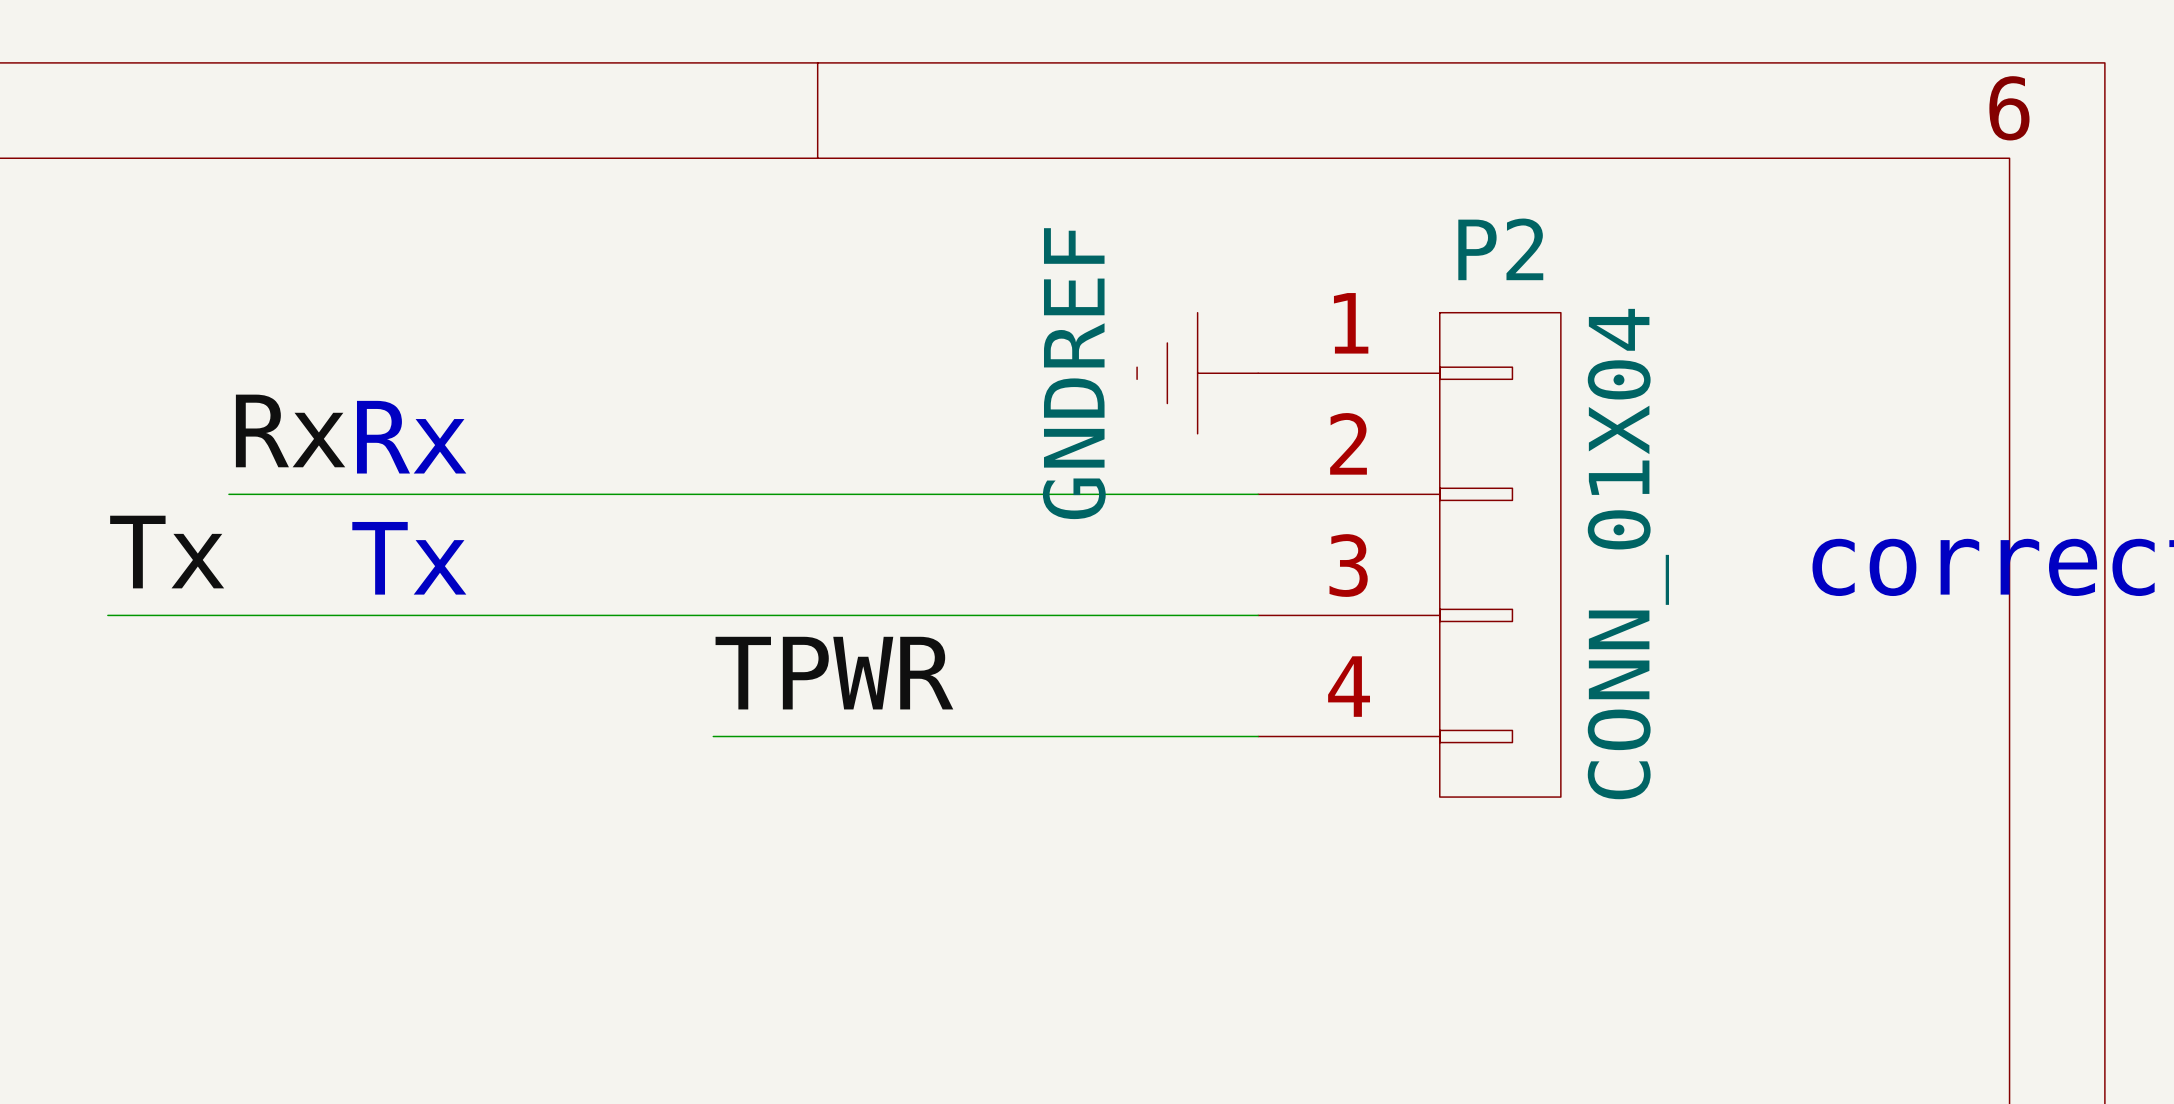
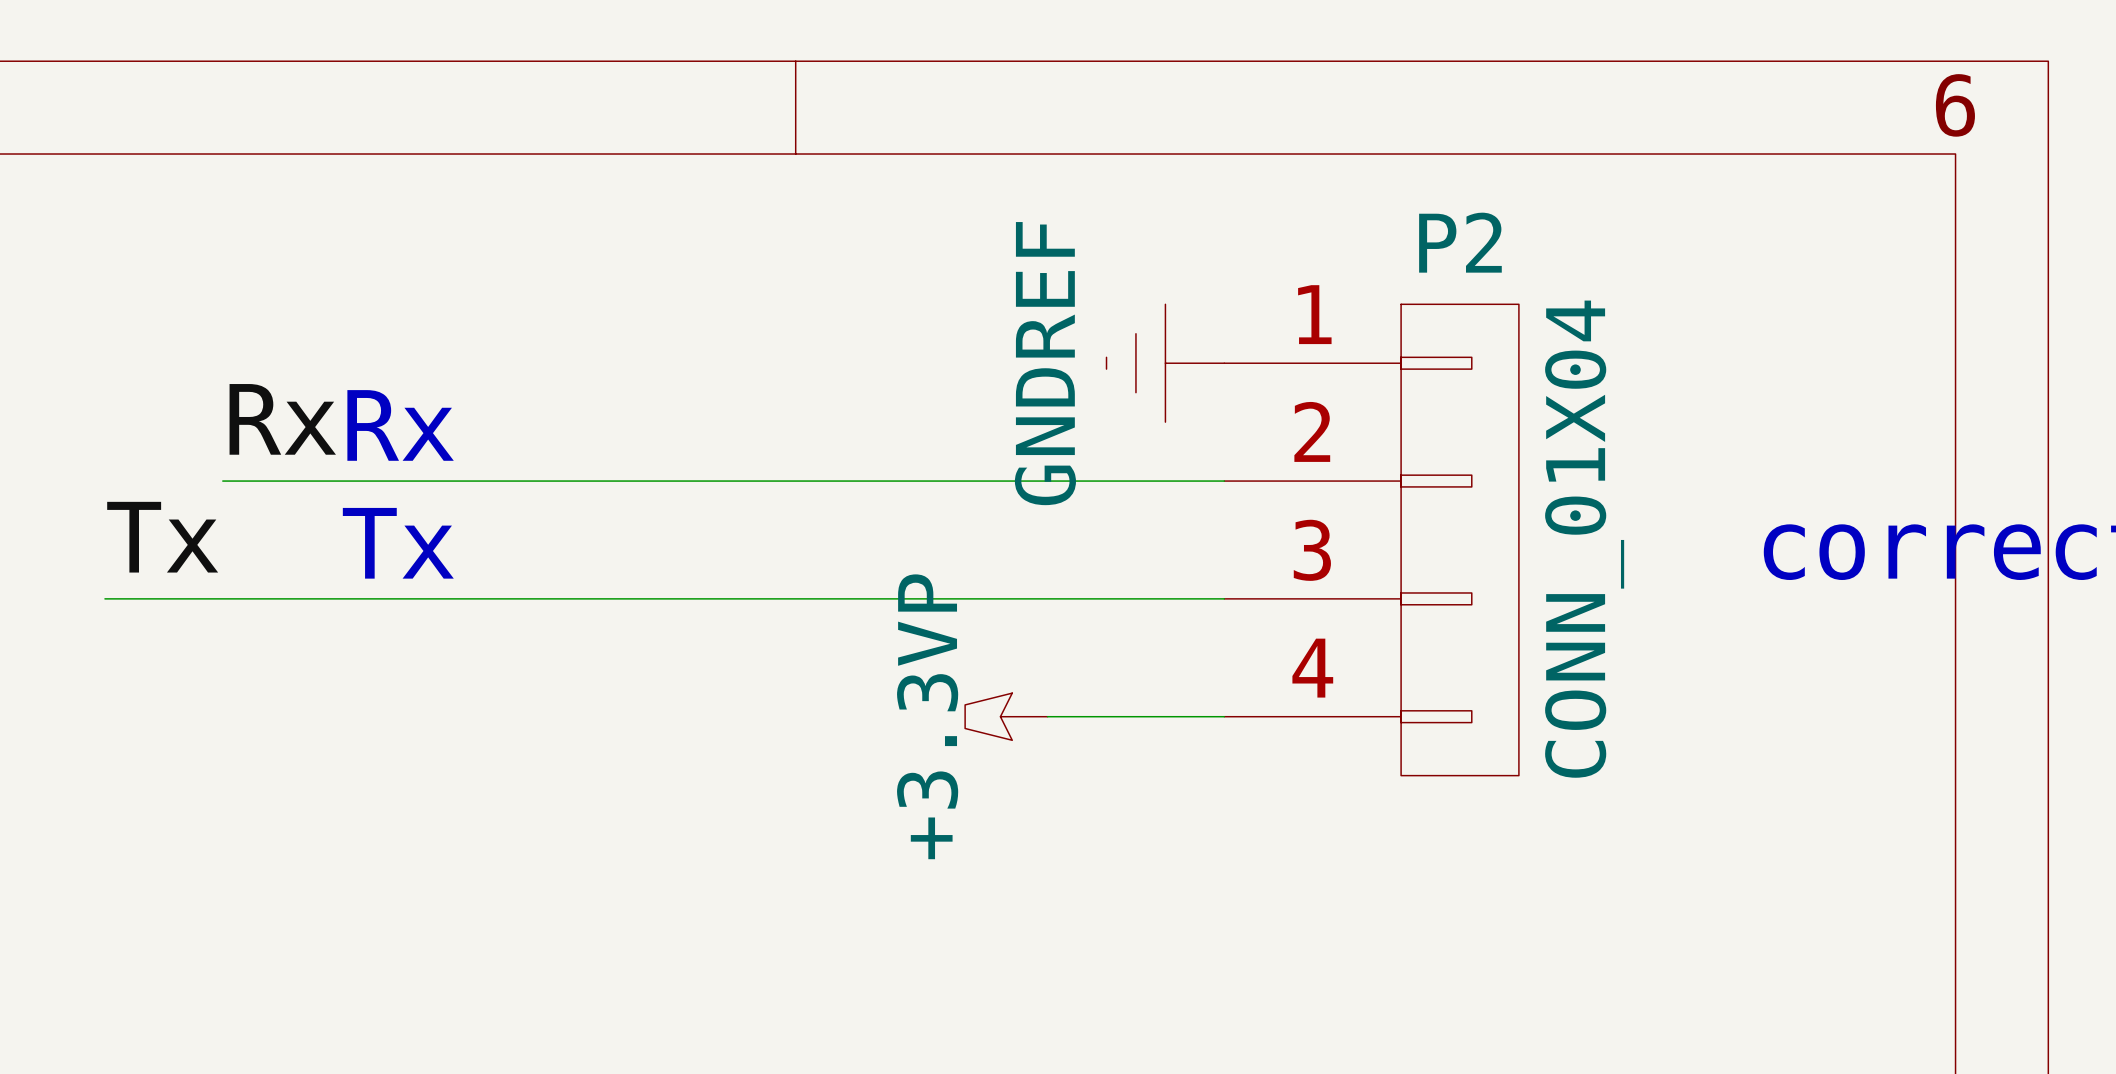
label: TPWR (834, 673) -> none
wire: (713, 736) (1076, 736) -> none
power symbol: none -> +3.3VP (1006, 716)

